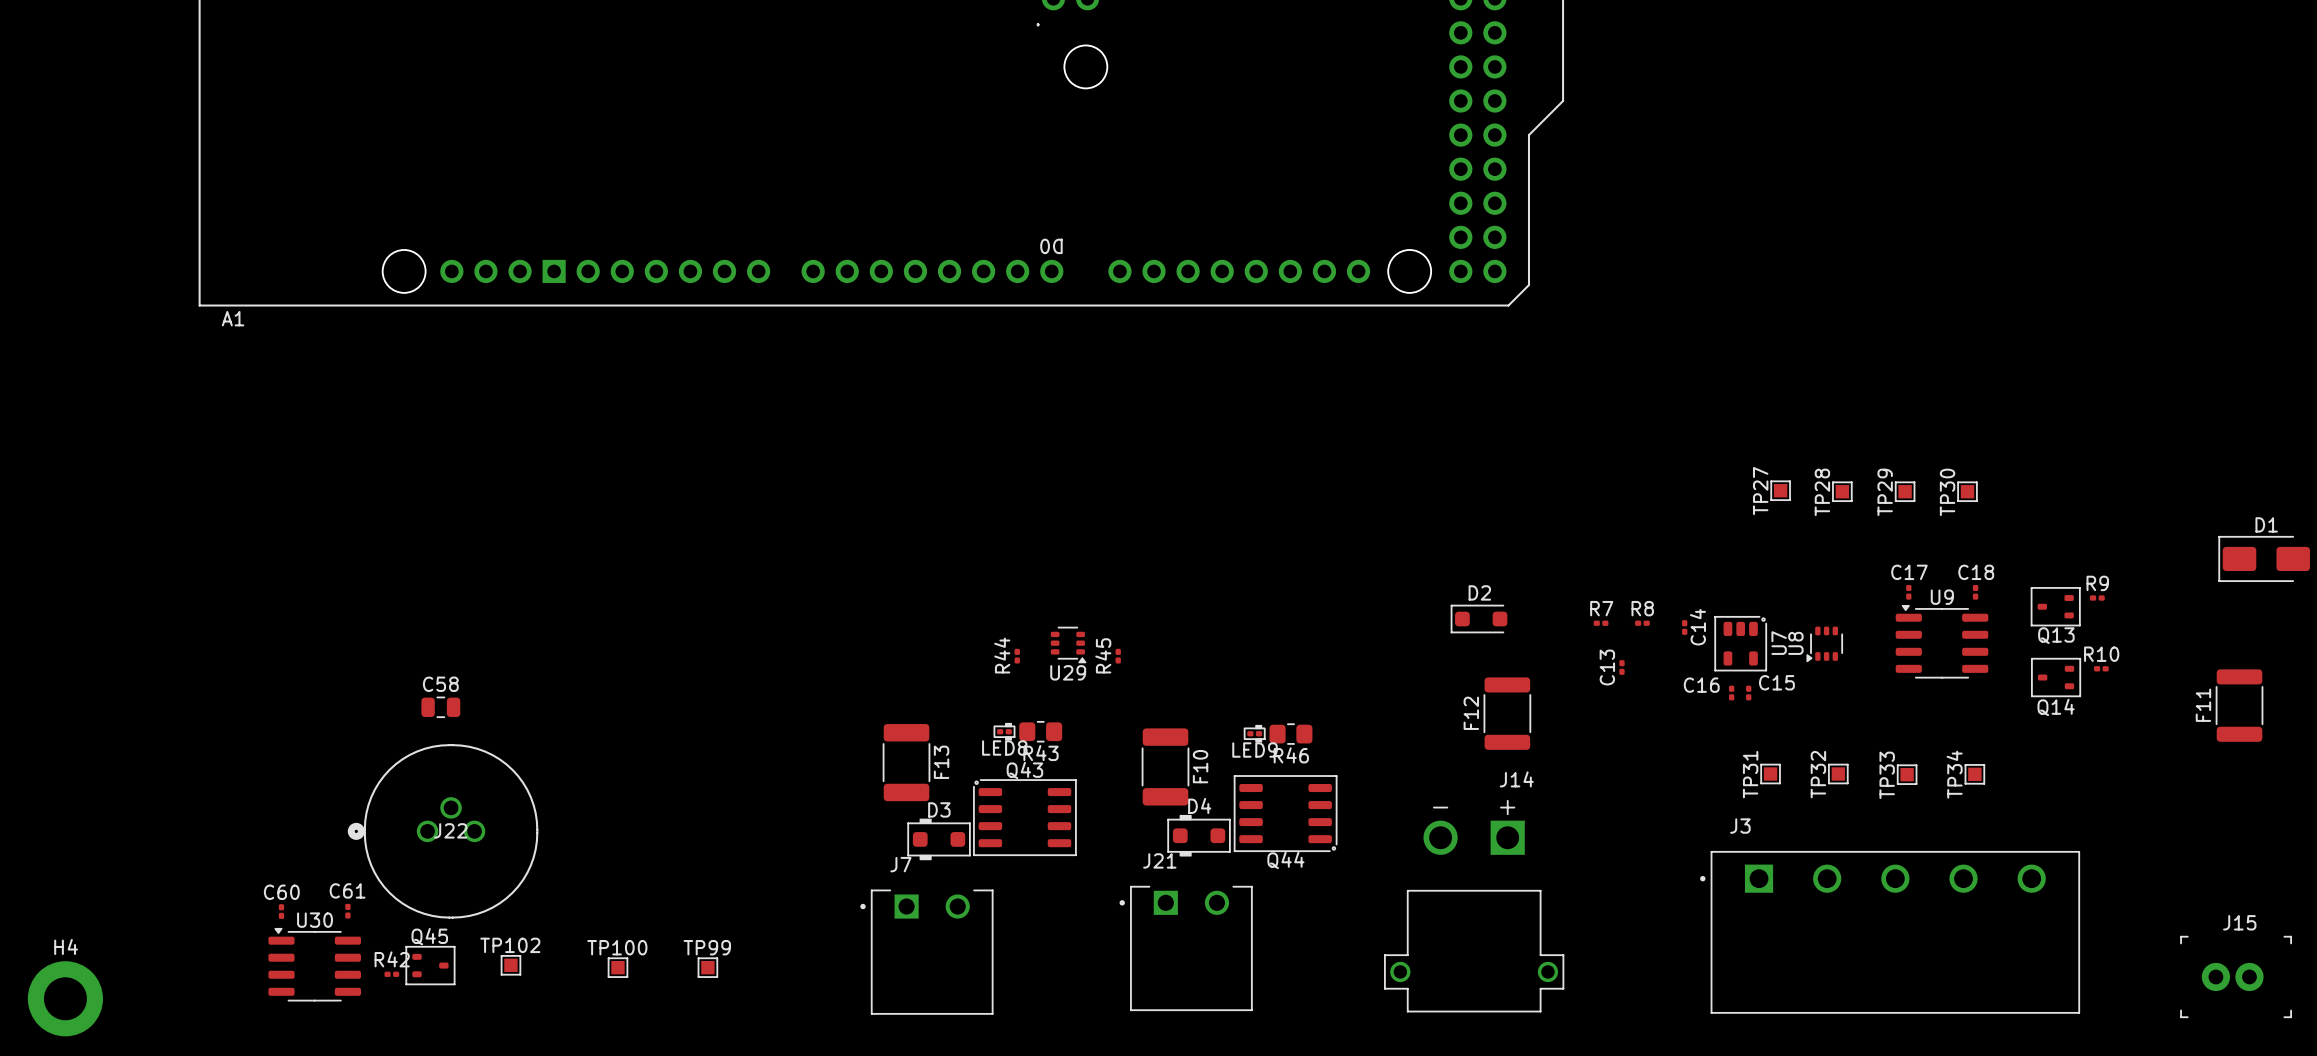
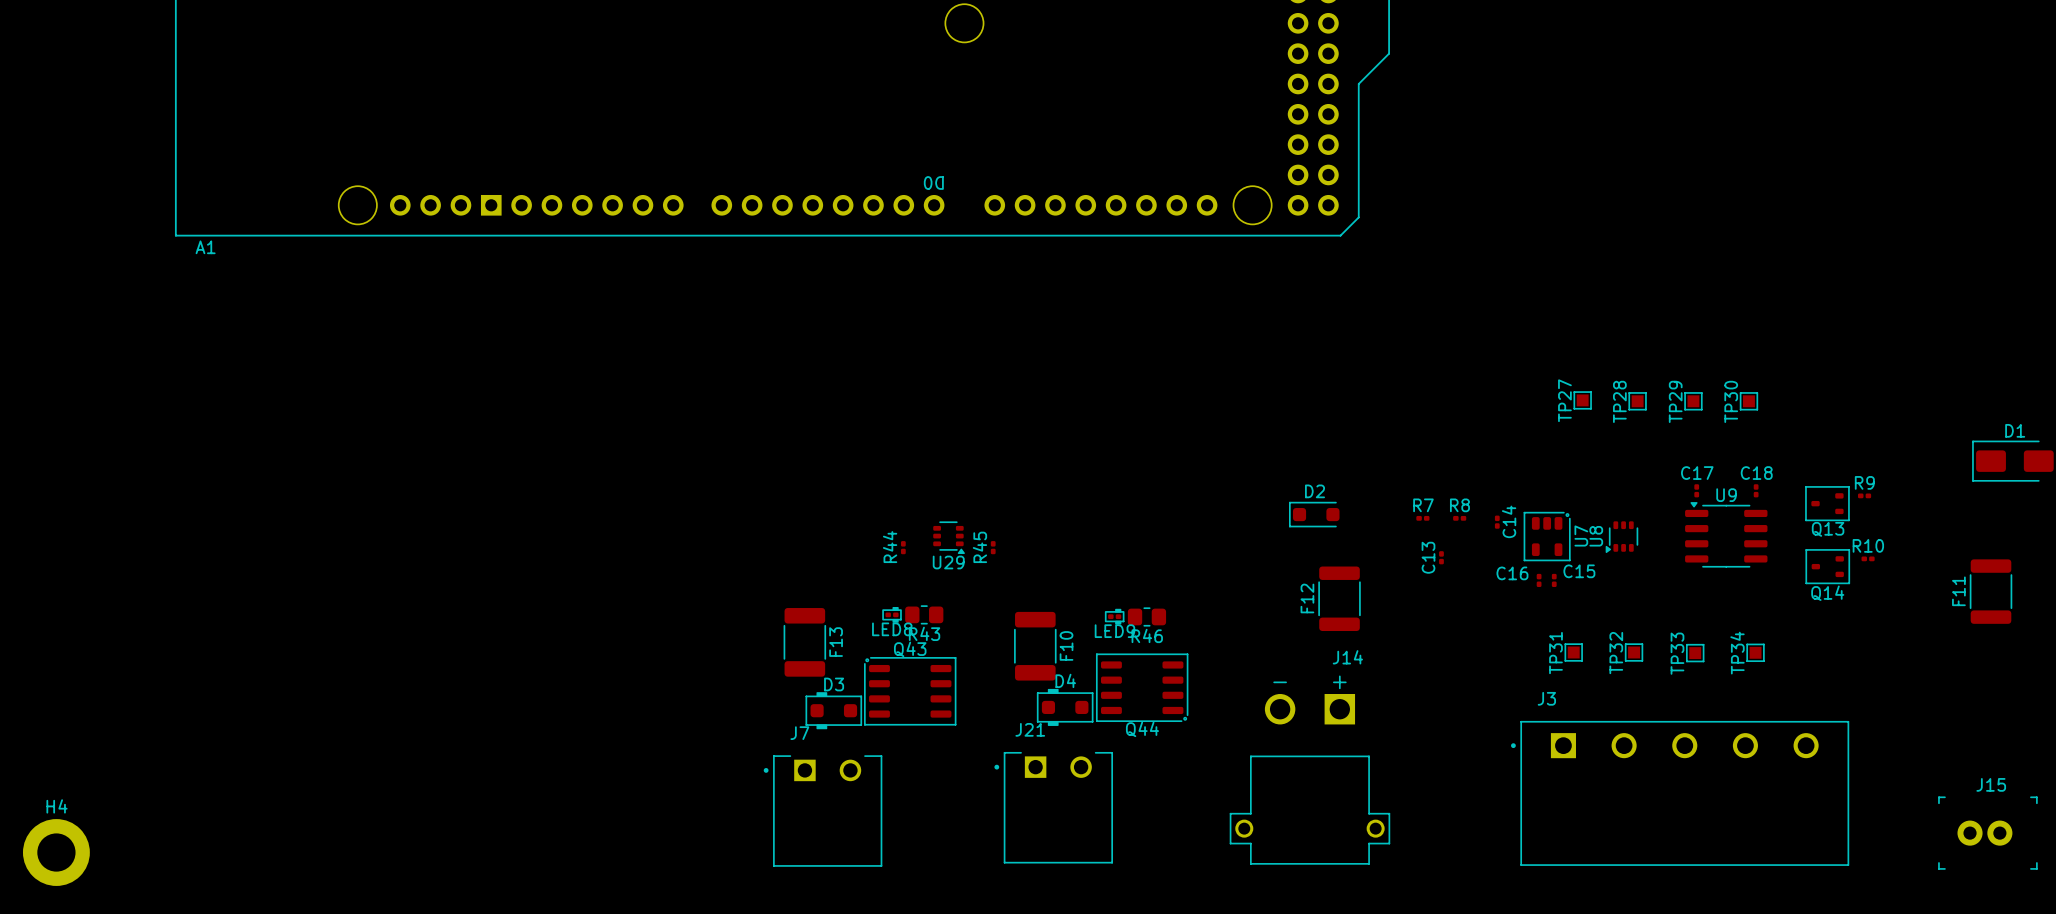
C58: (440, 707) -> none
J22: (443, 831) -> none
C60: (281, 911) -> none
C61: (347, 911) -> none
U30: (314, 964) -> none
Q45: (430, 965) -> none
TP102: (510, 965) -> none
TP100: (617, 967) -> none
TP99: (707, 967) -> none
R42: (391, 974) -> none

